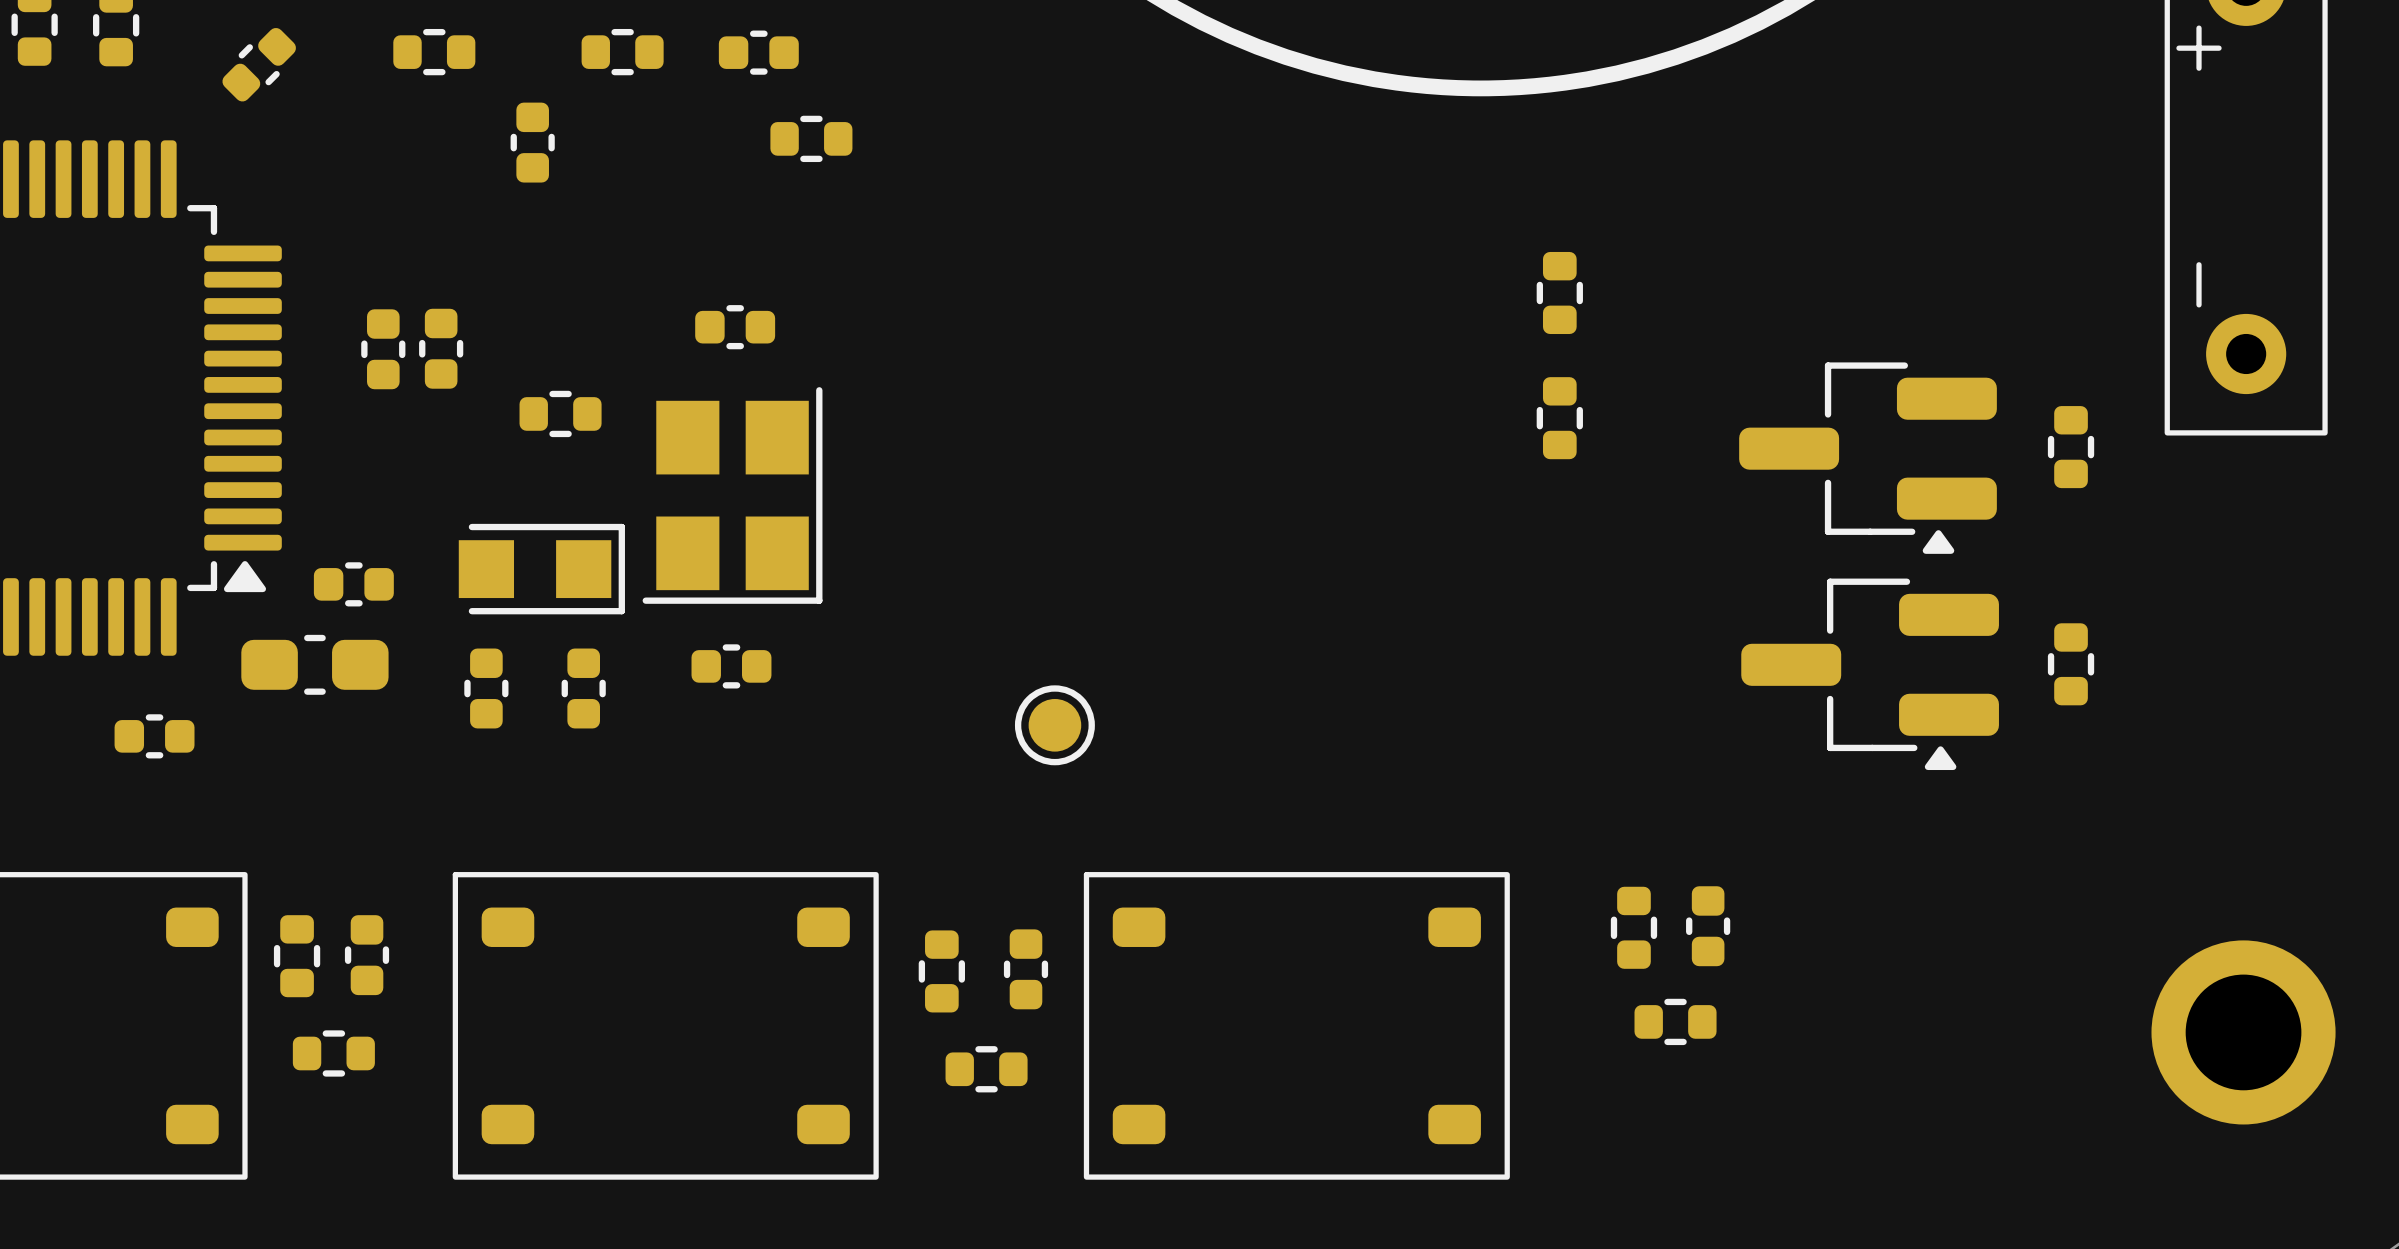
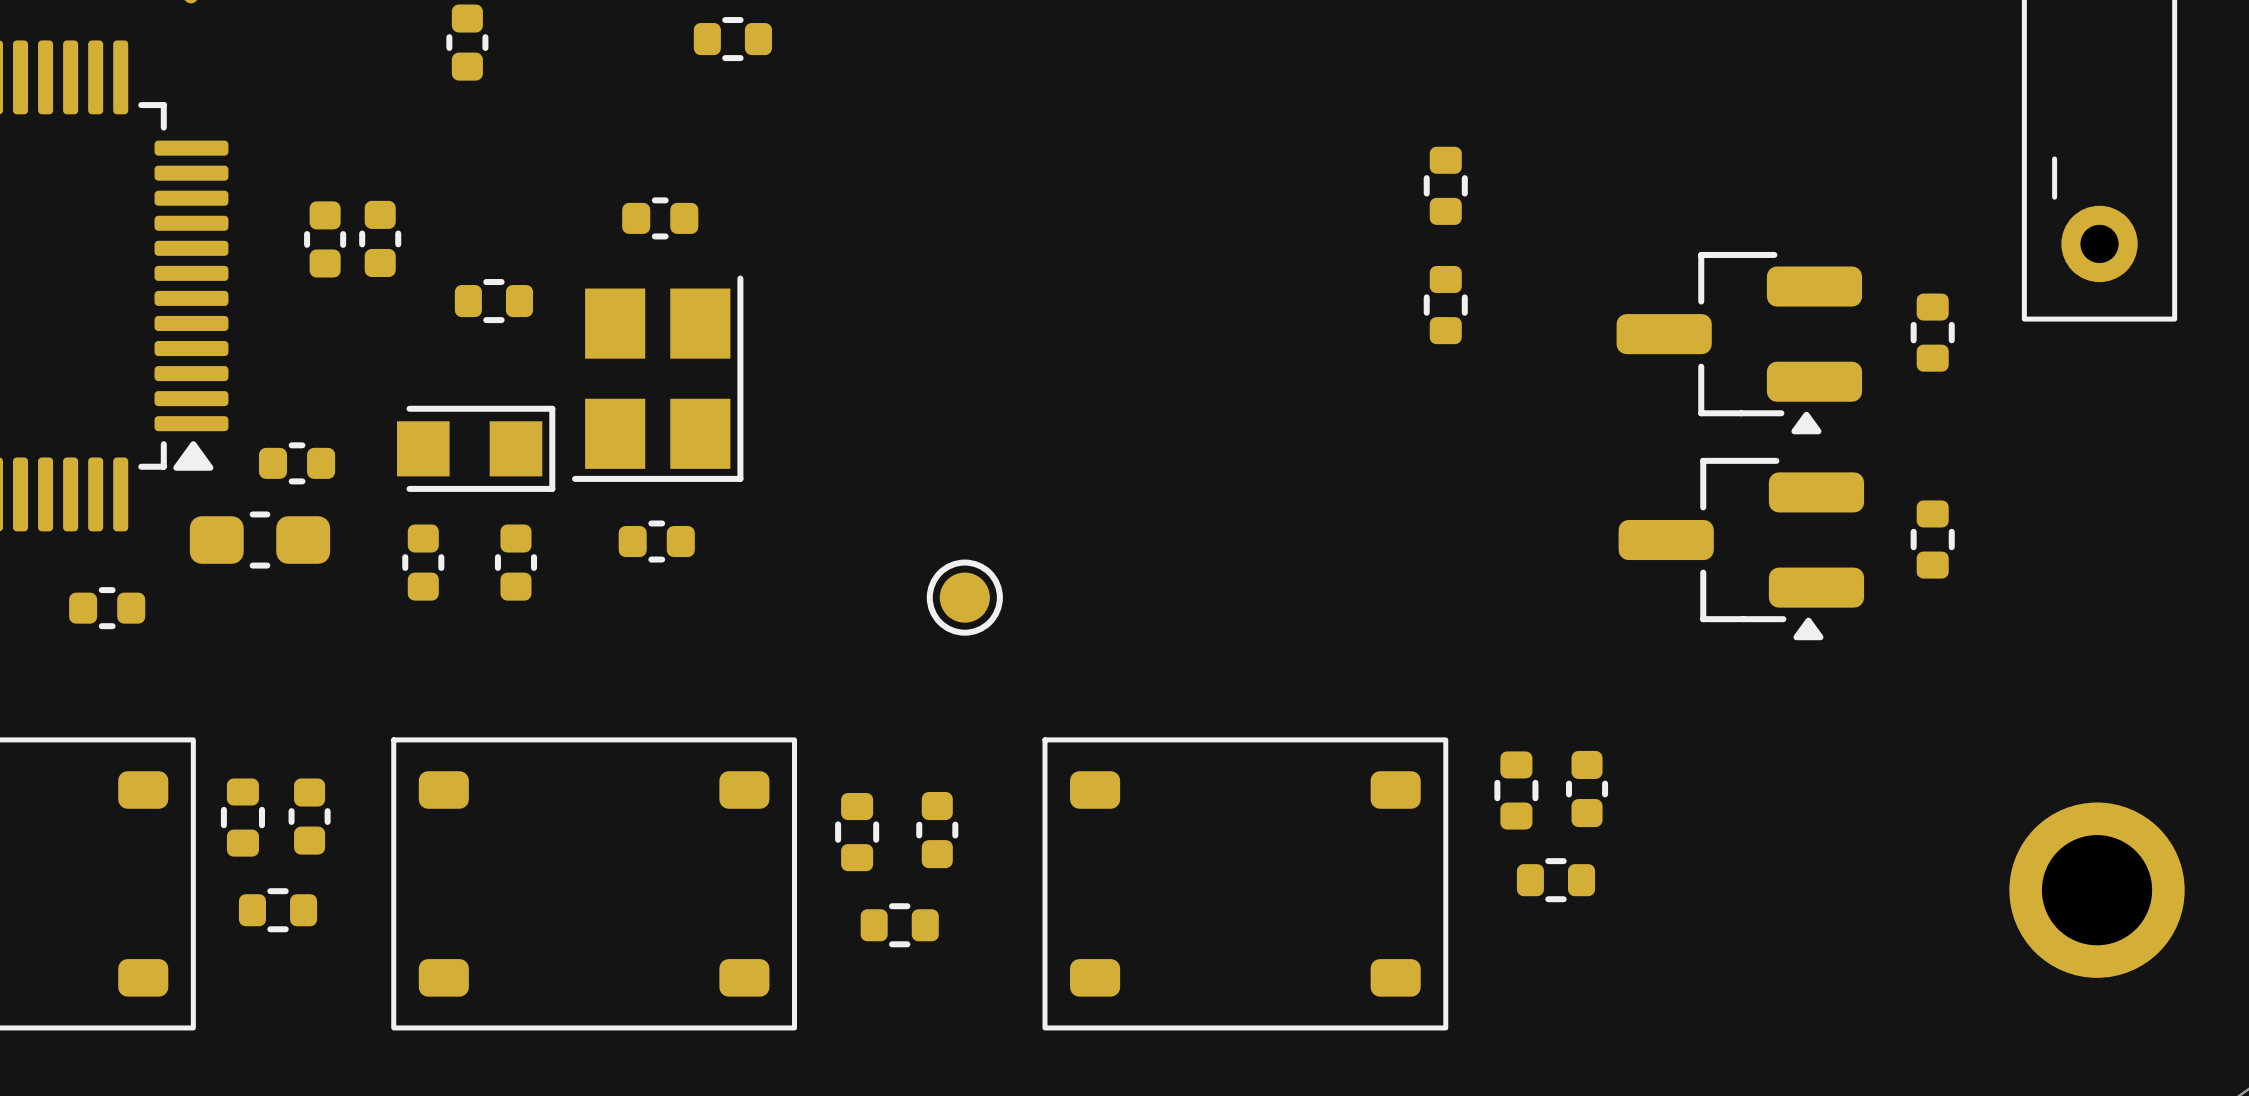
part position: (1296, 1025) -> (1245, 883)

